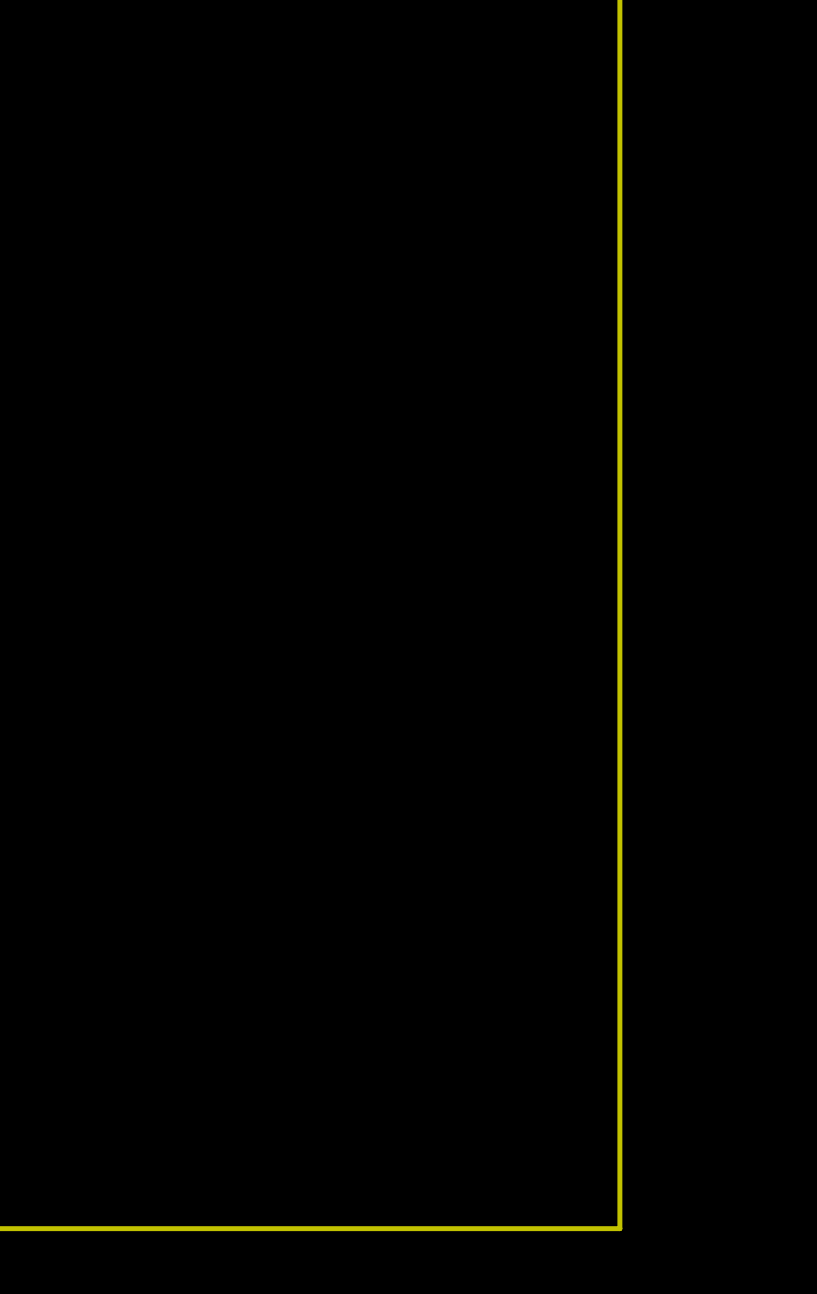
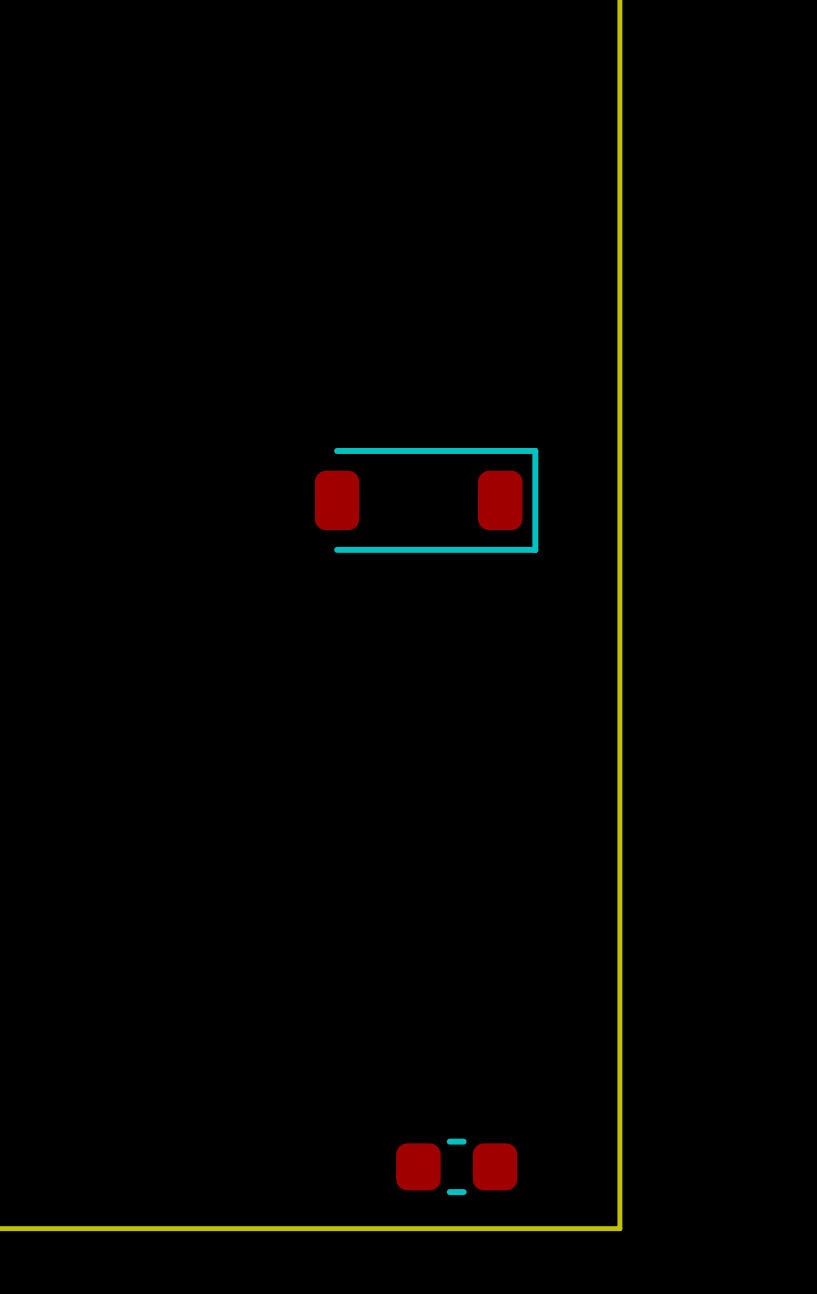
part: none -> (426, 500)
part: none -> (456, 1166)

